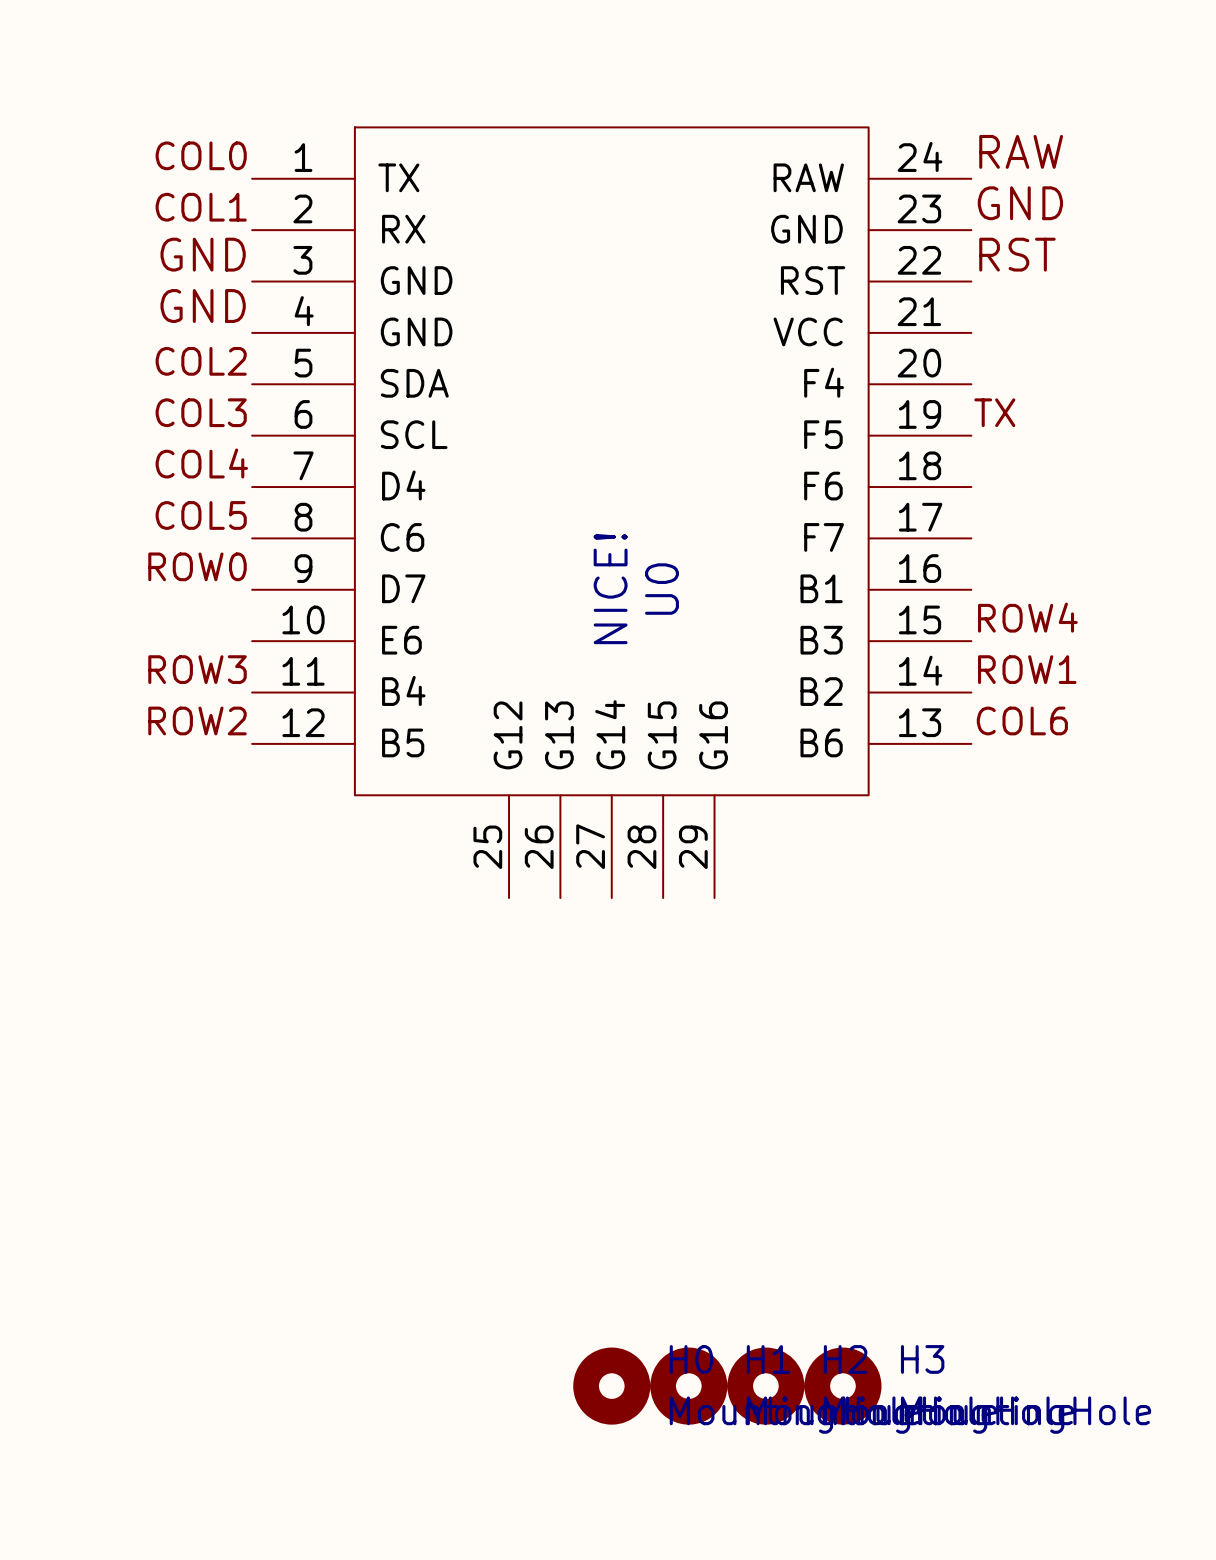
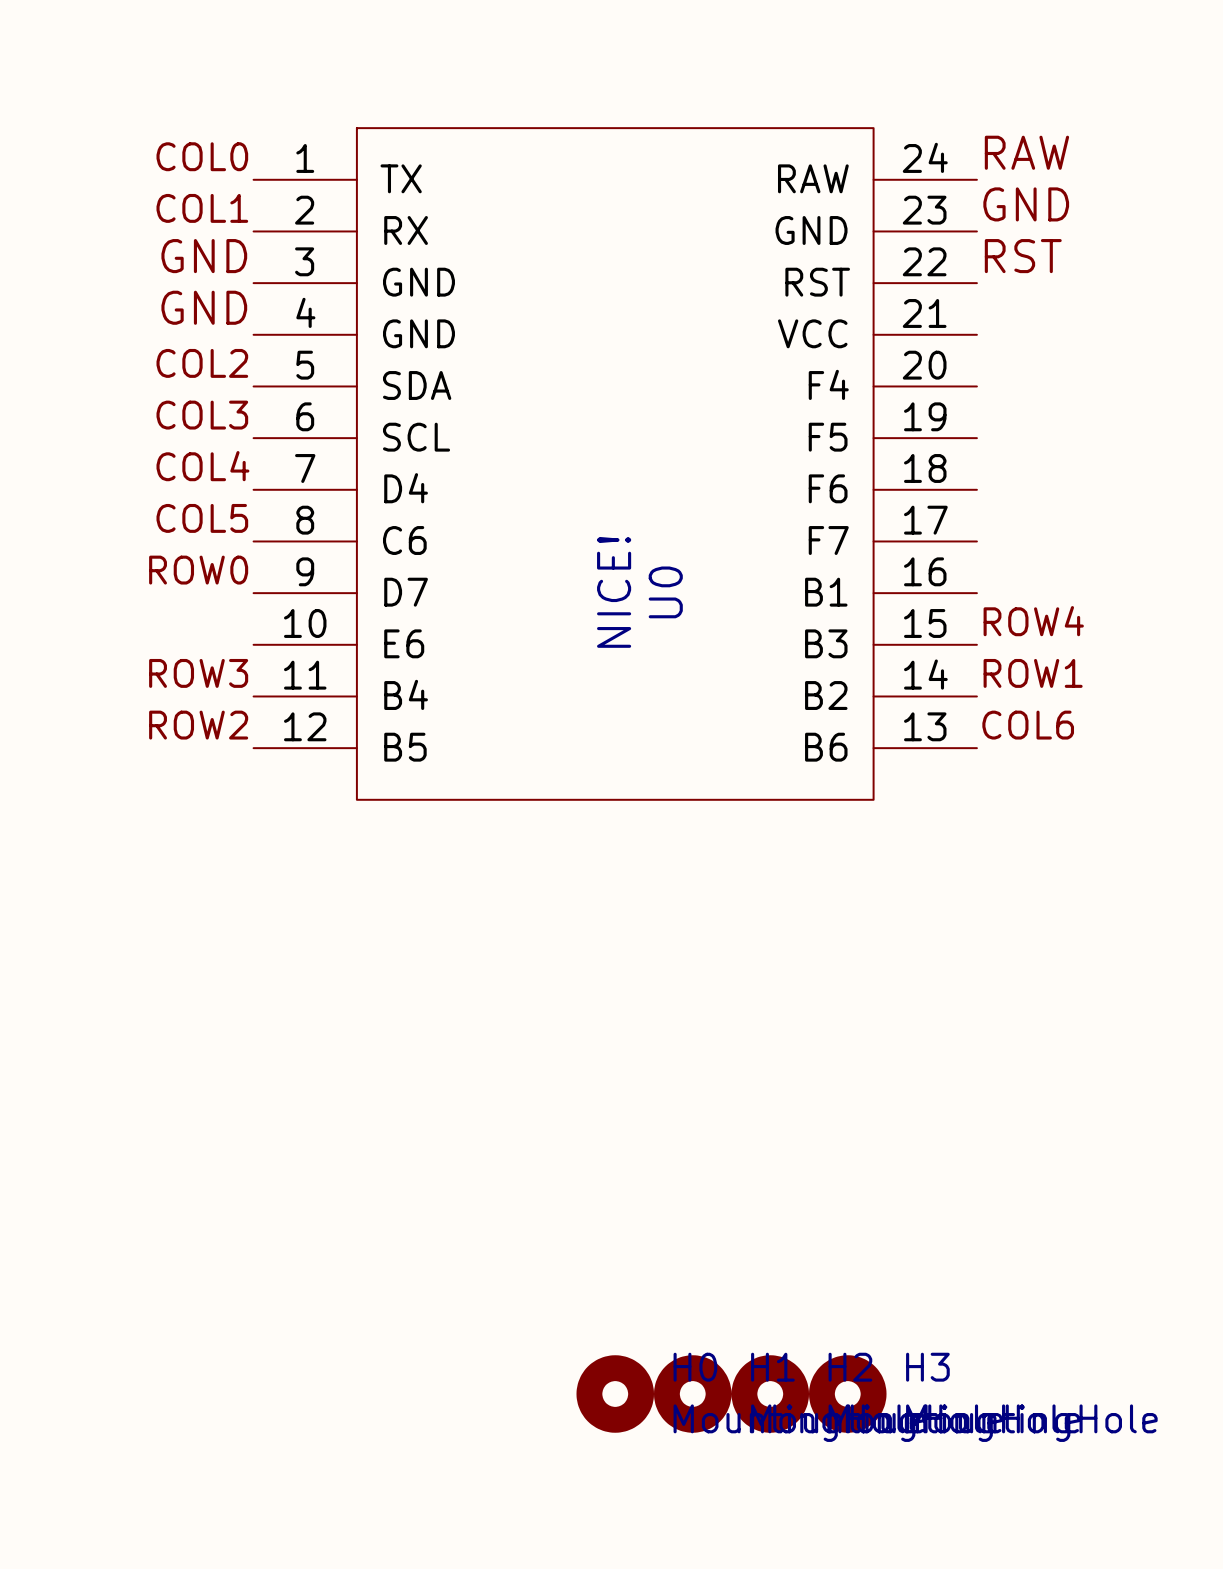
U0 symbol: [252, 127, 972, 899] -> [253, 128, 977, 800]
label: TX (994, 412) -> none

